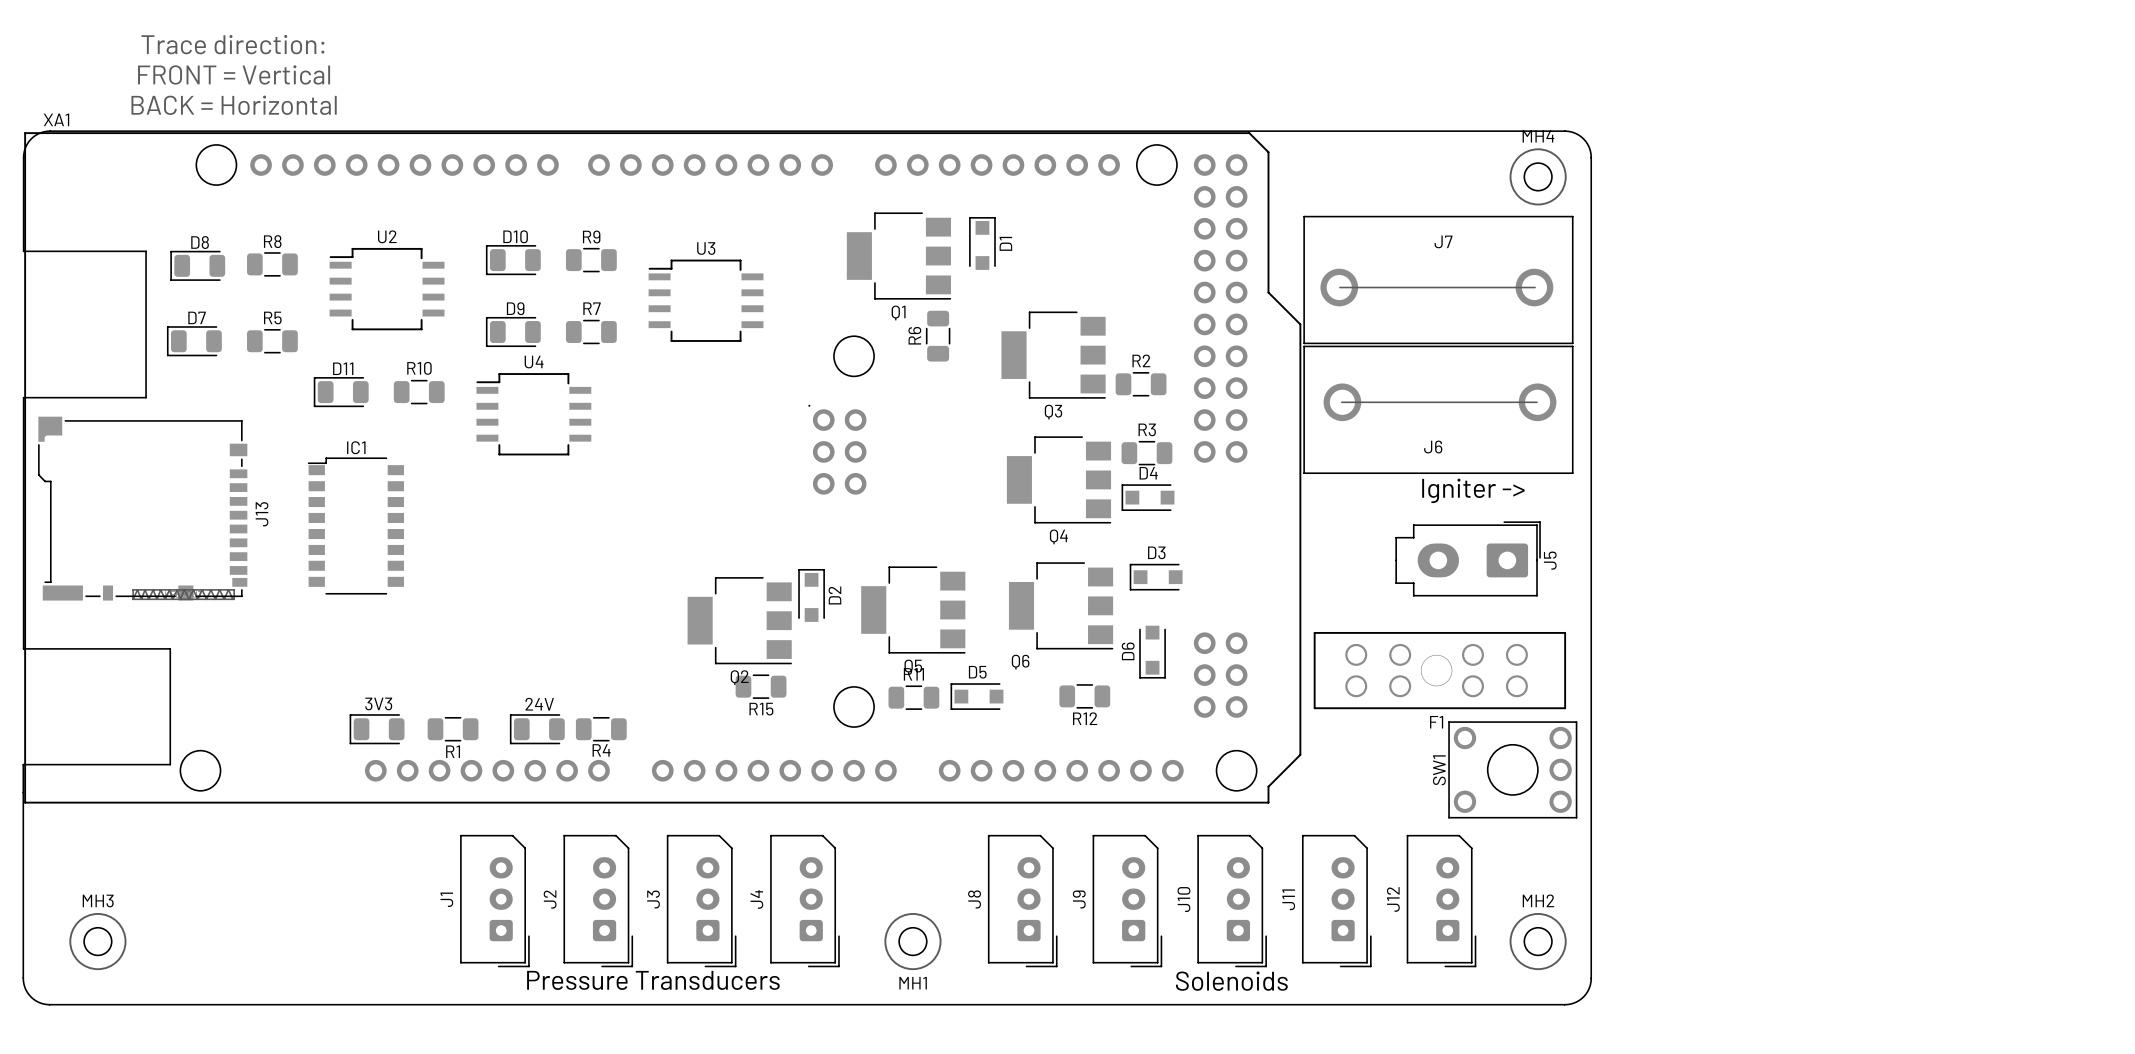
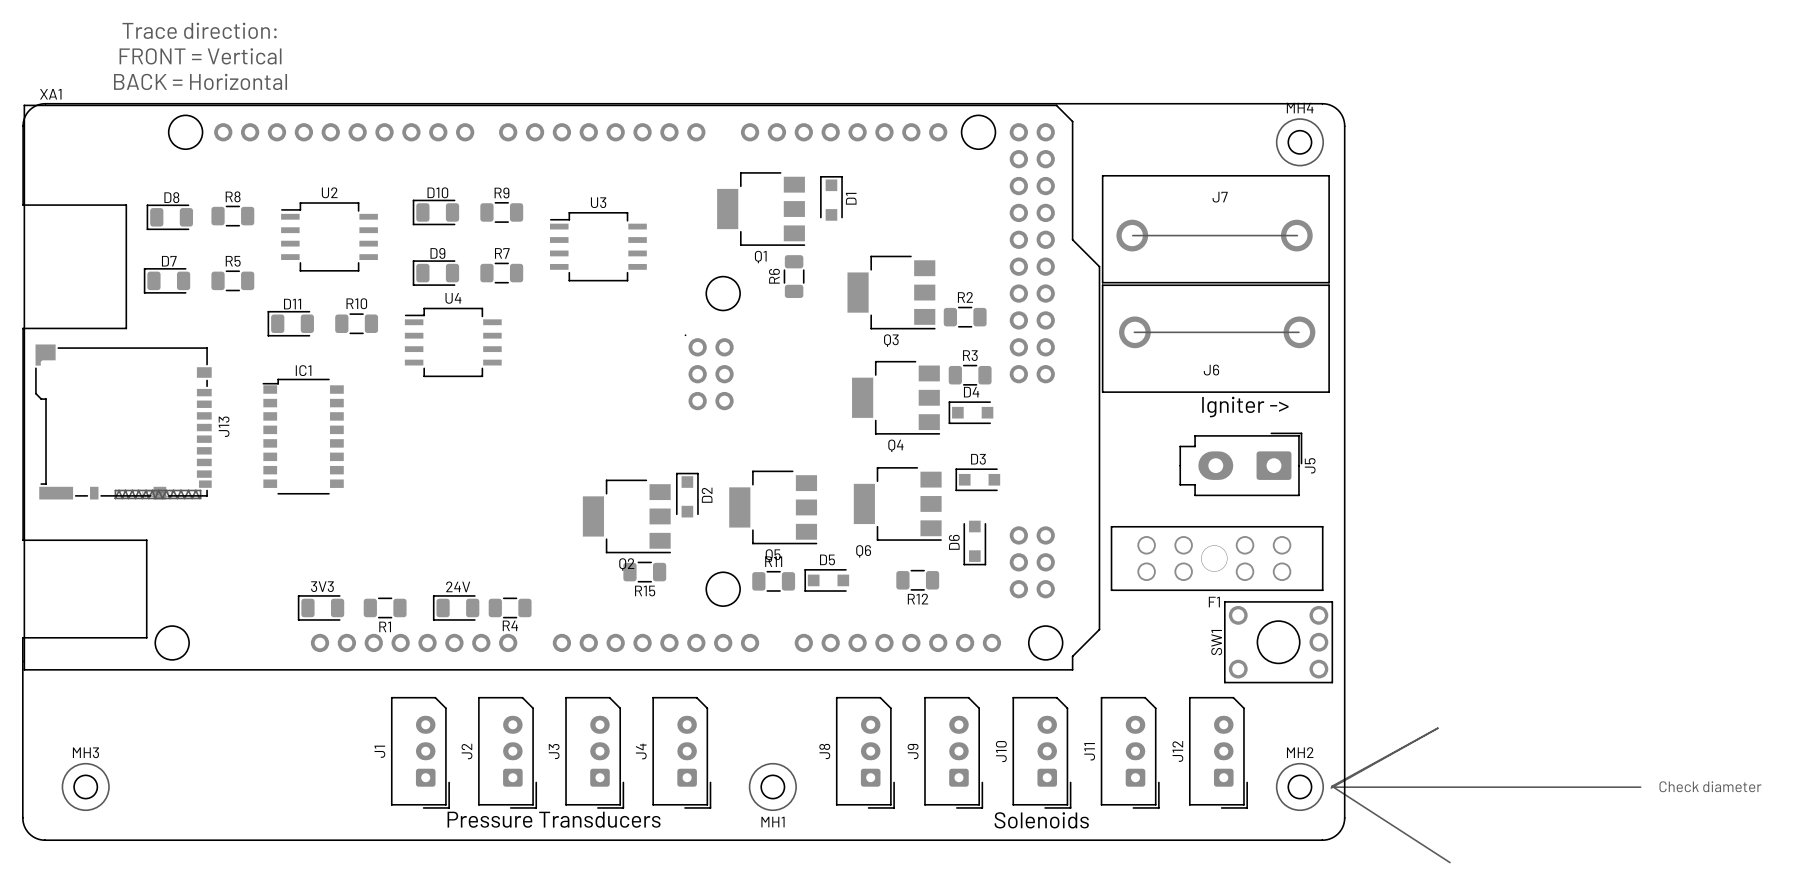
line: none -> (1333, 787) (1640, 787)
text: none -> Check diameter (1710, 786)
line: none -> (1331, 788) (1437, 728) (1332, 786) (1449, 862)

